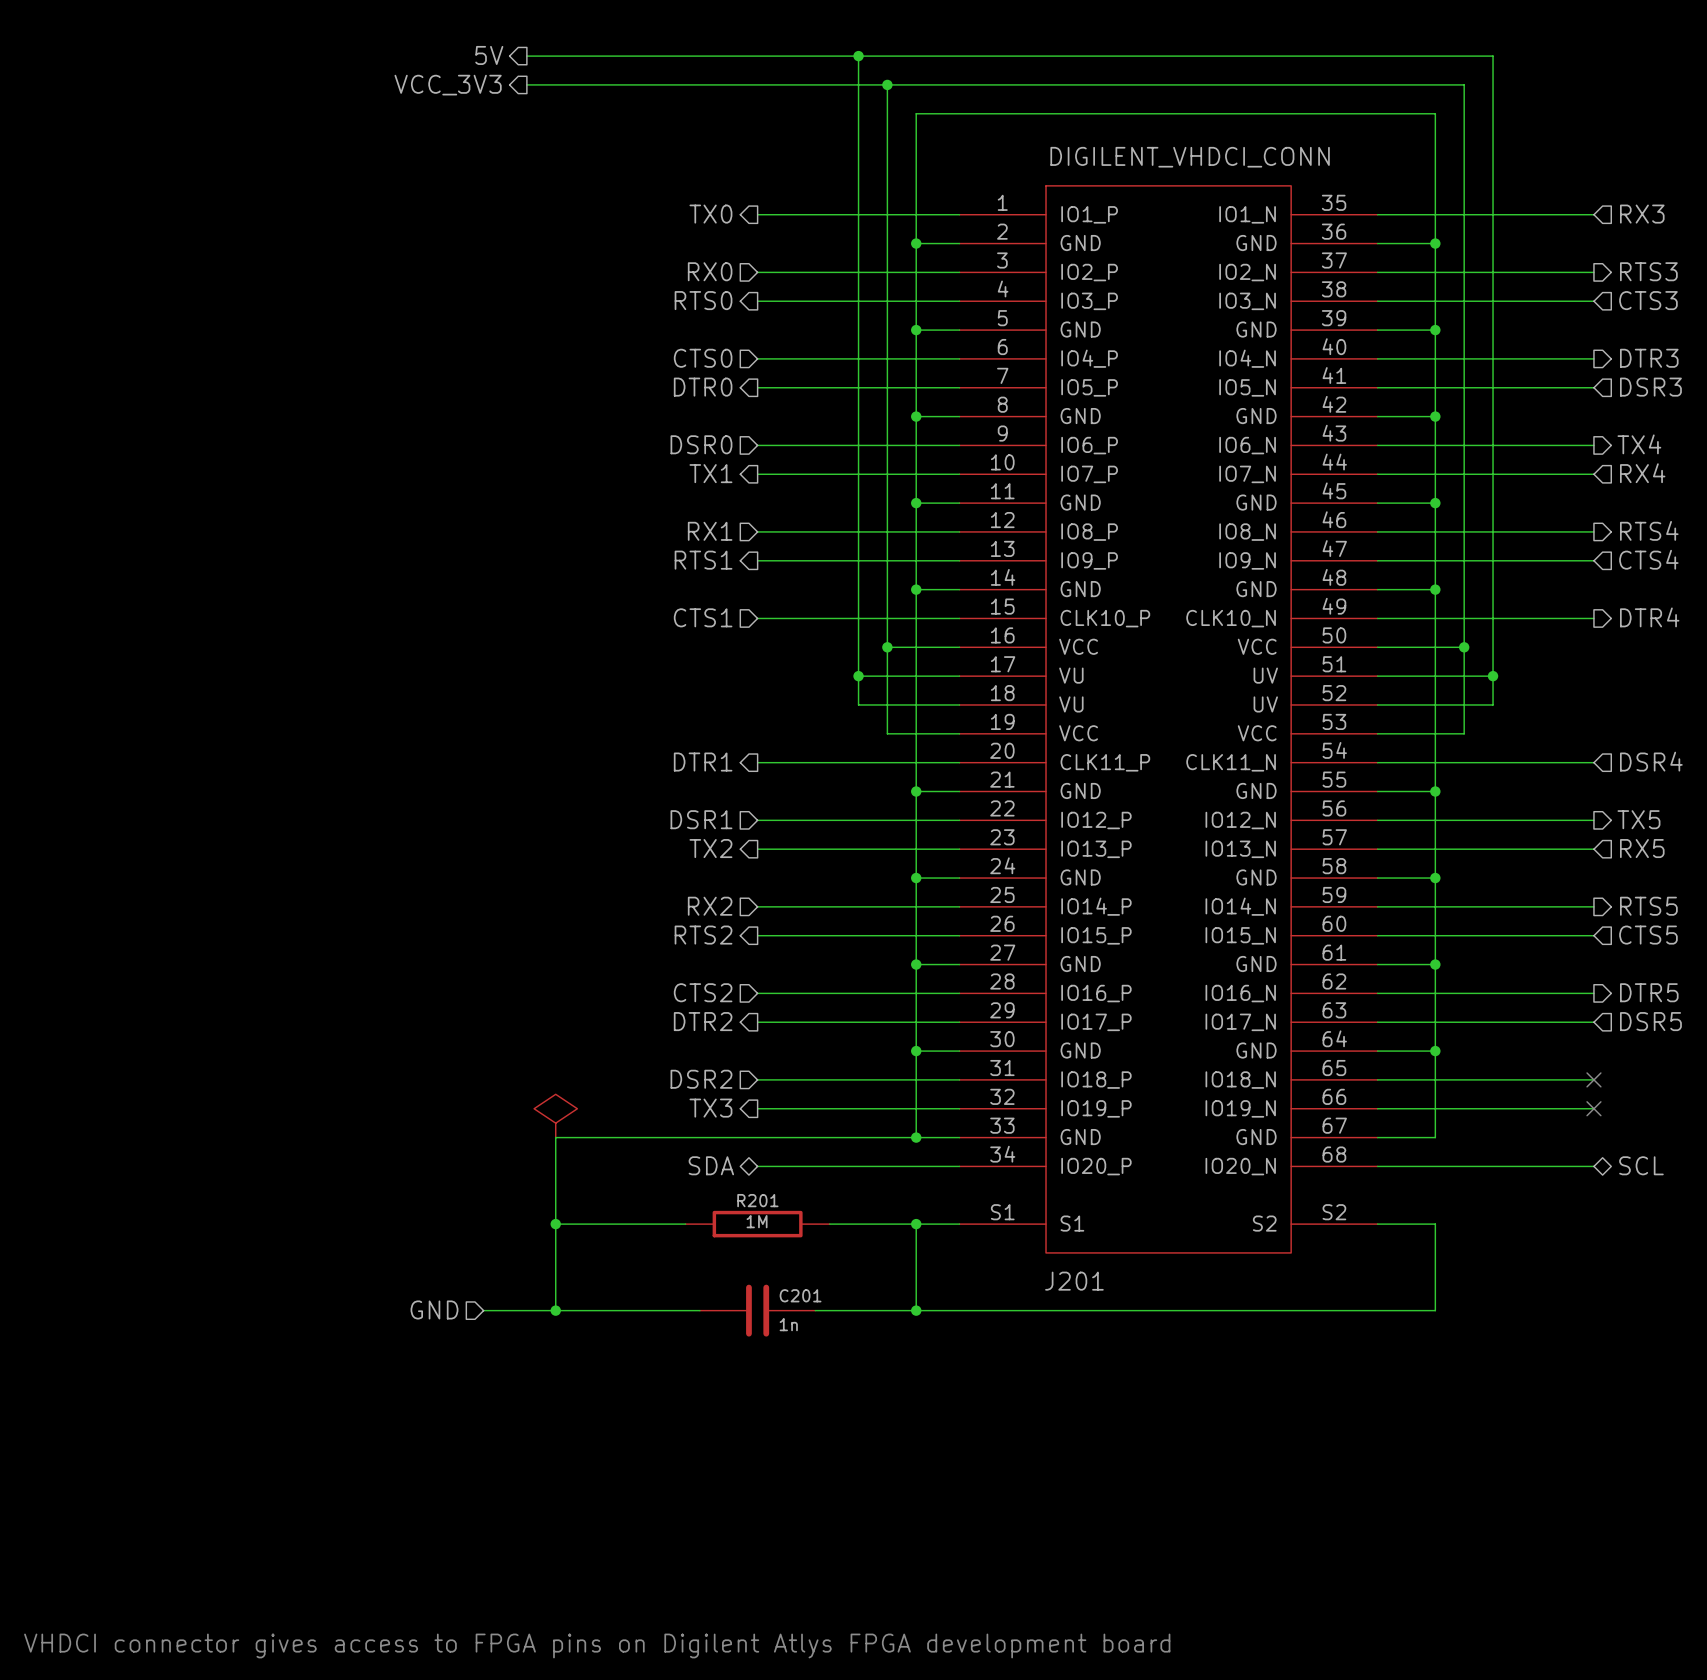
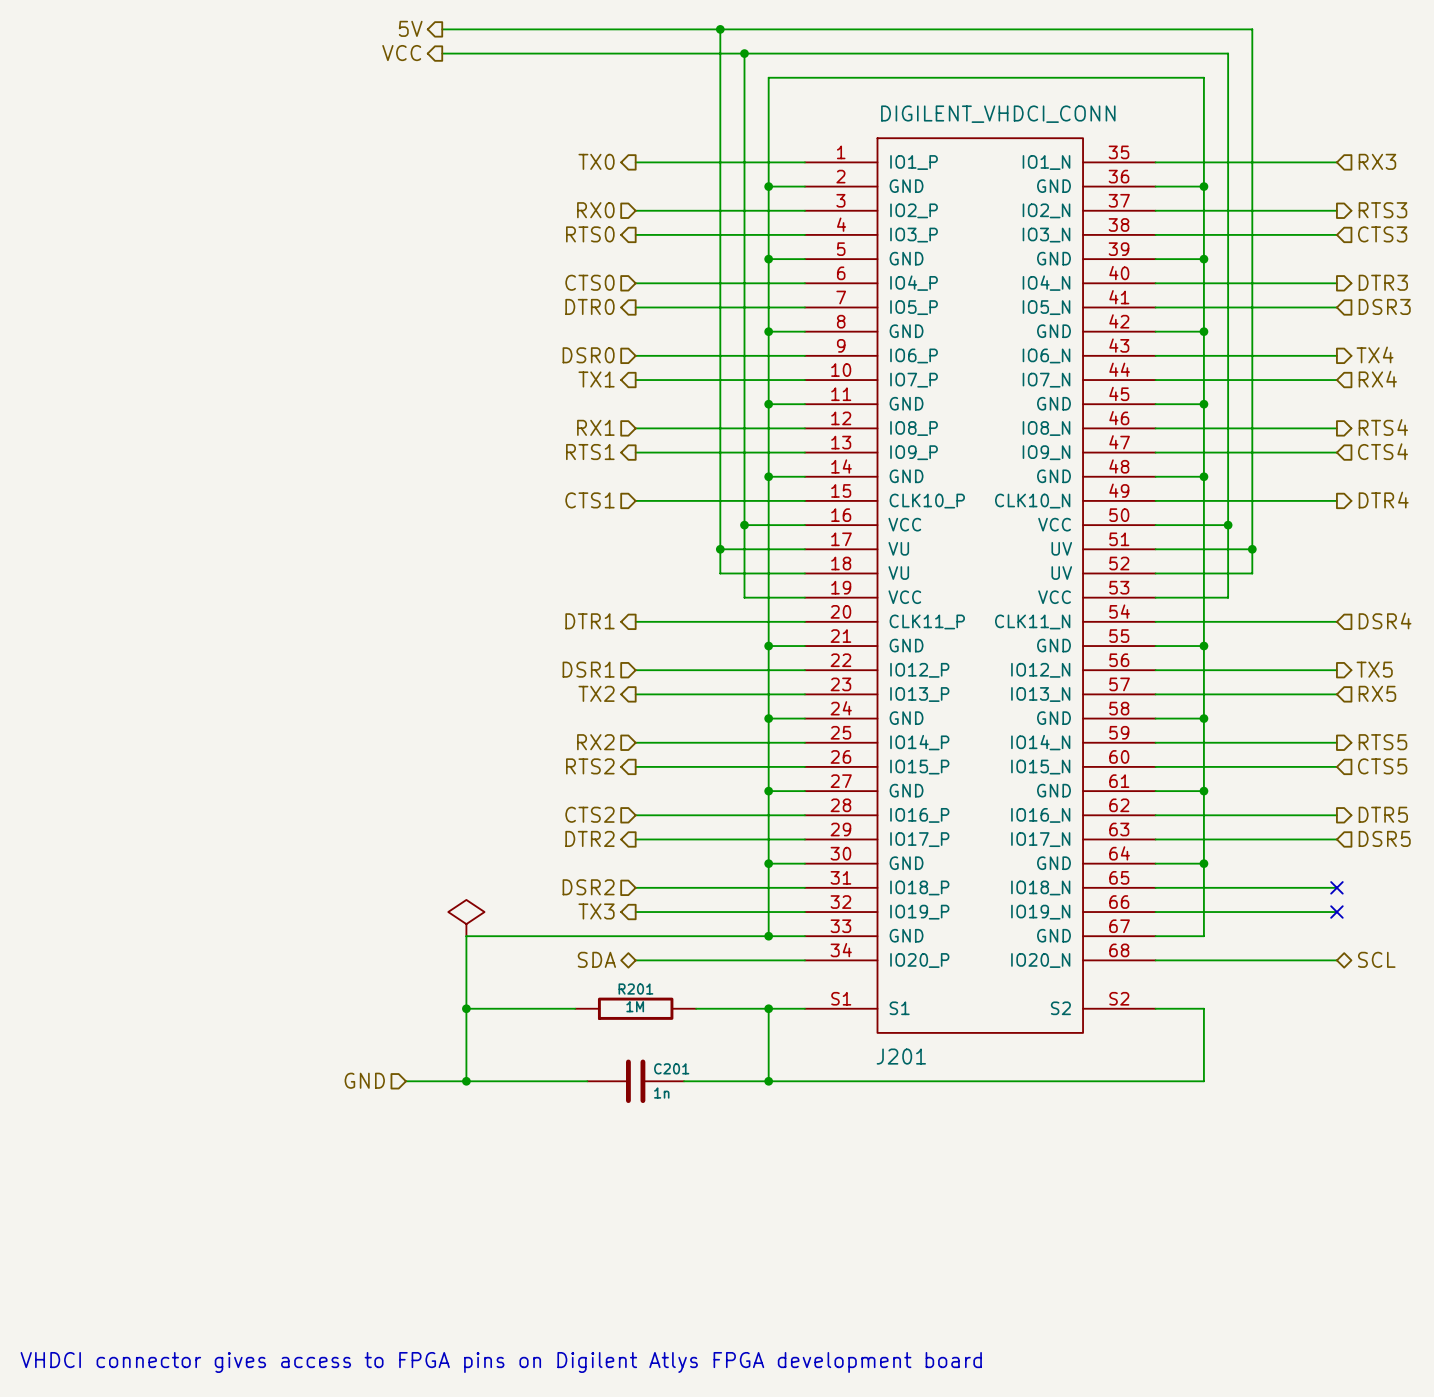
hierarchical label: VCC_3V3 (448, 85) -> VCC (401, 53)

